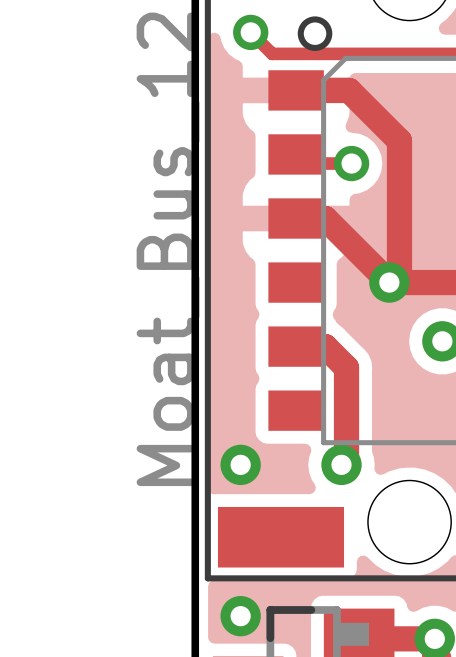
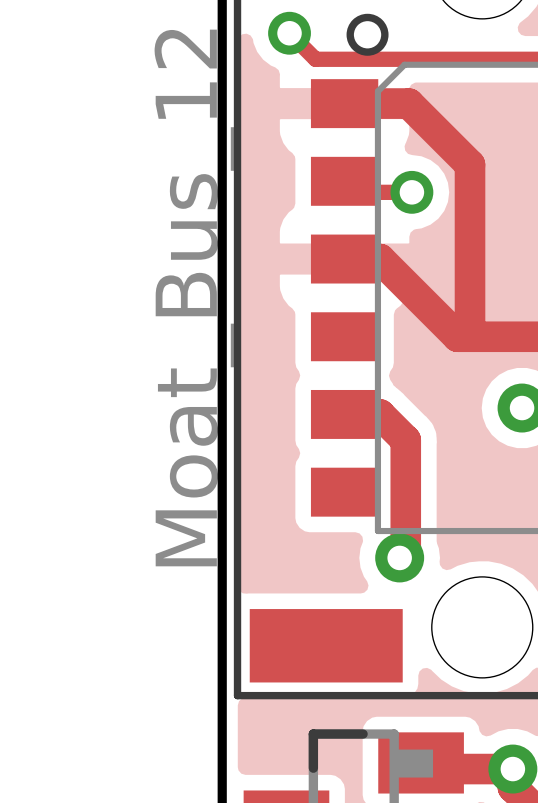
via: (389, 282) -> none
via: (240, 464) -> none
via: (240, 616) -> none

